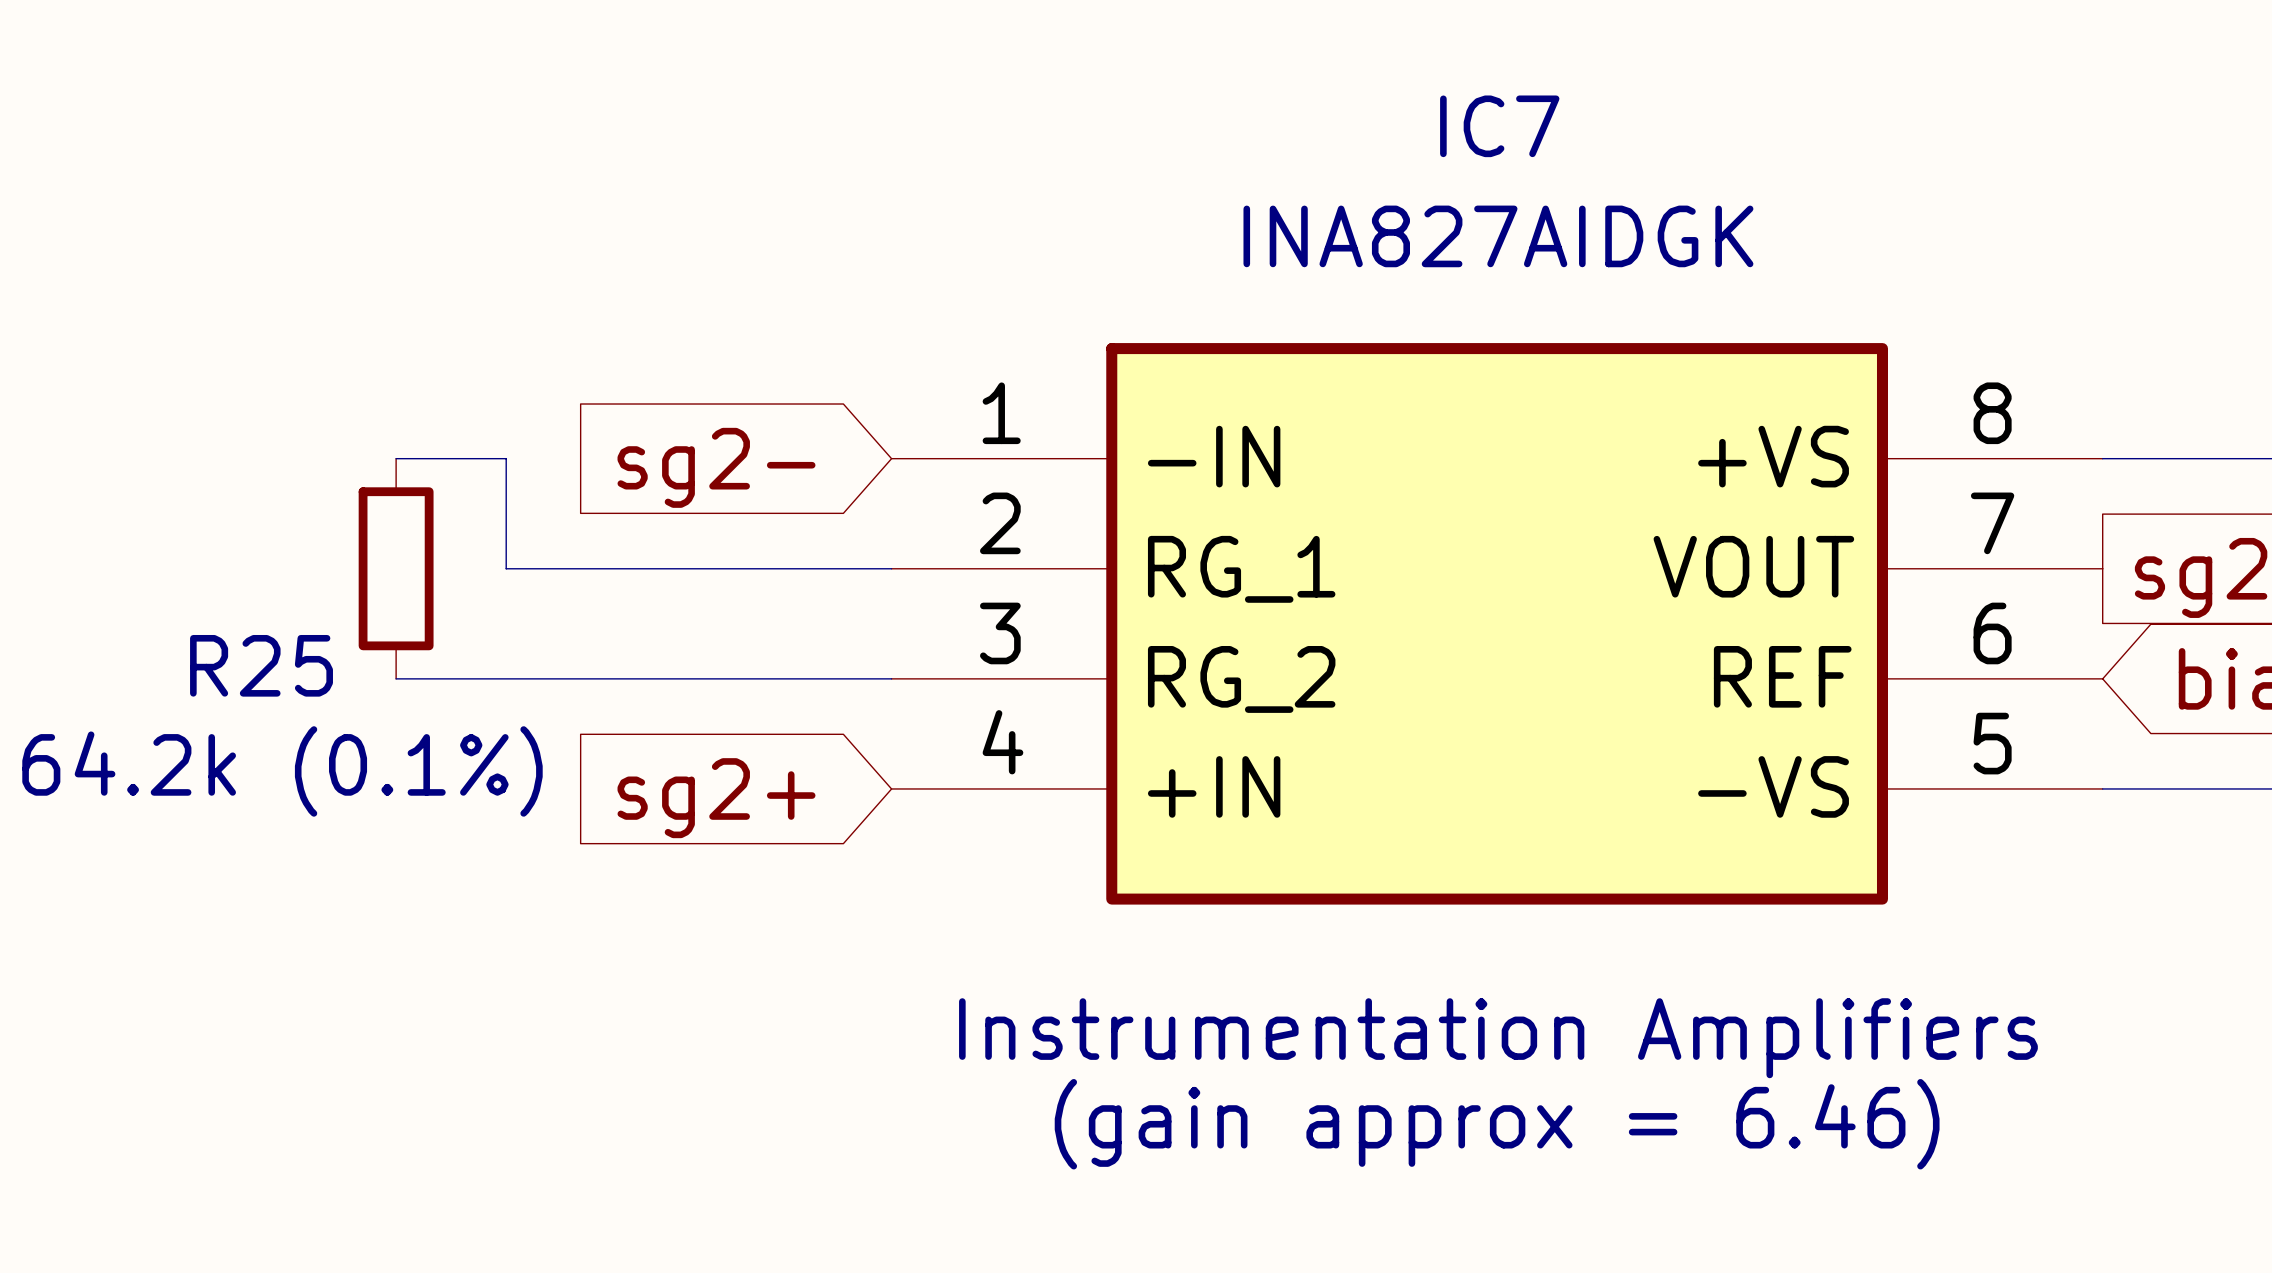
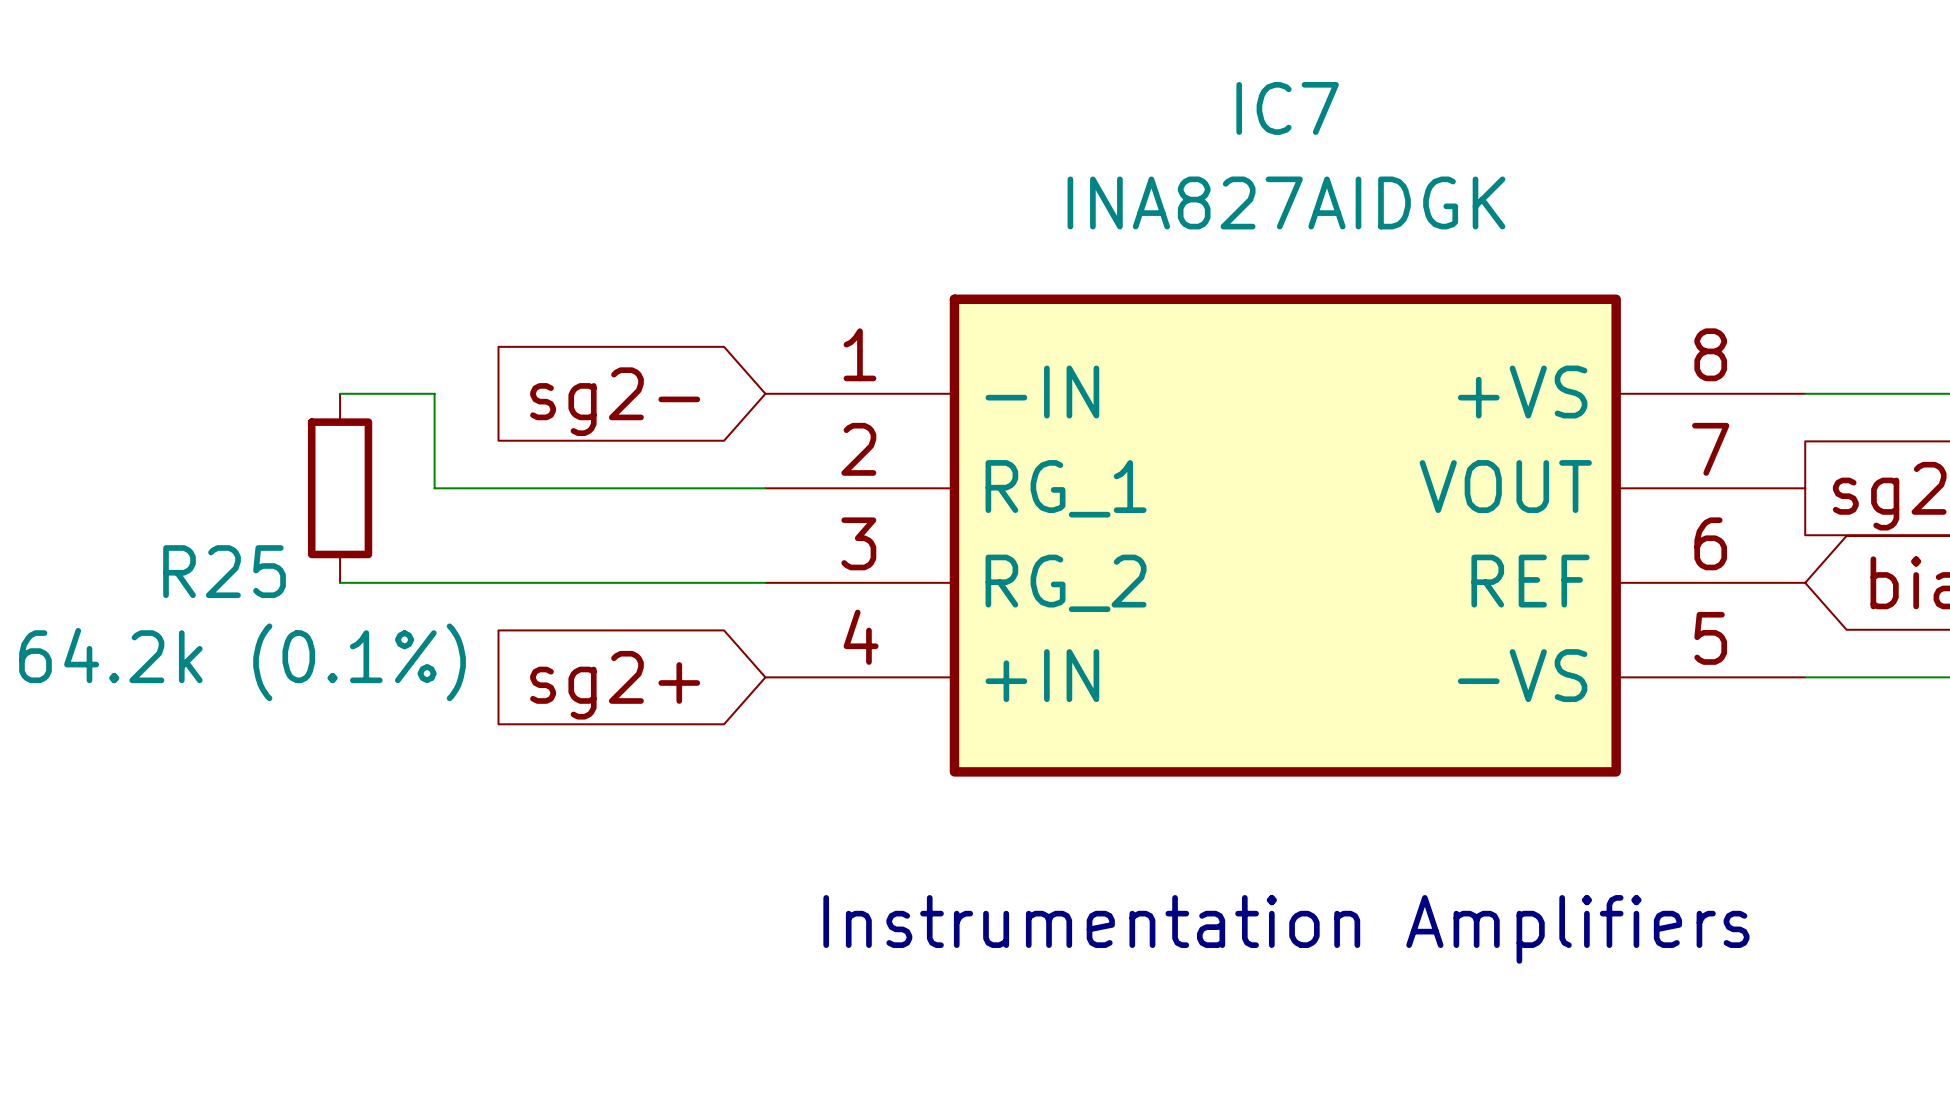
text position: Instrumentation Amplifiers (1498, 1038) -> Instrumentation Amplifiers (1286, 929)
text: (gain approx = 6.46) (1497, 1124) -> none

